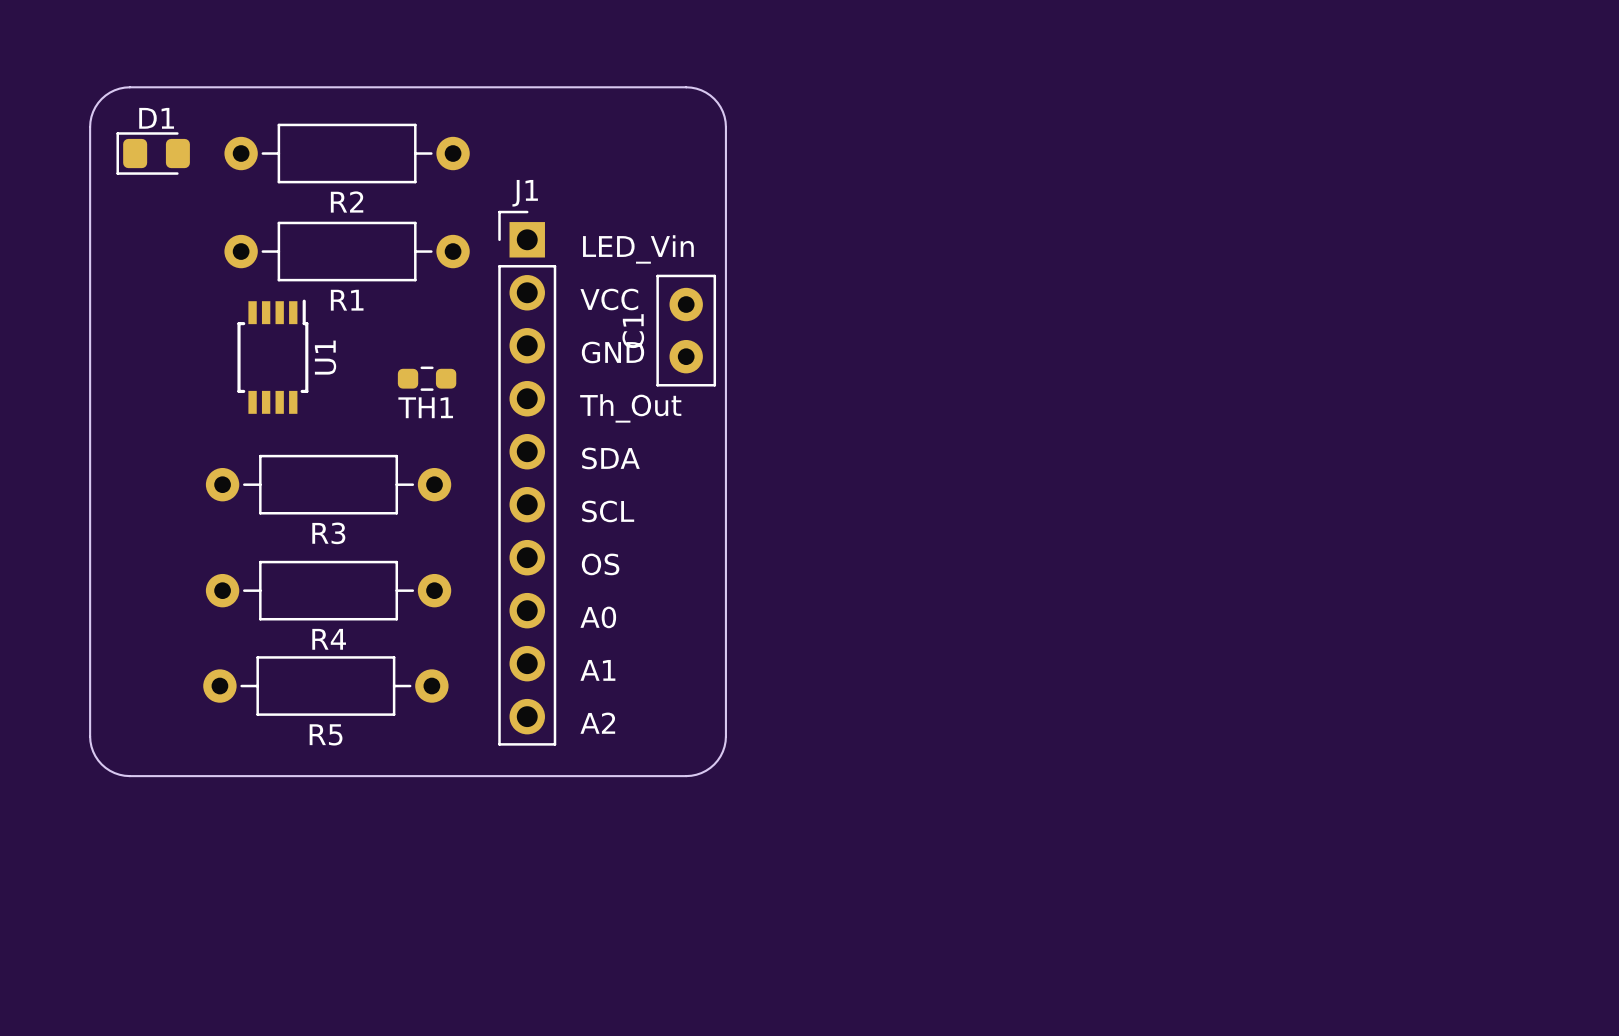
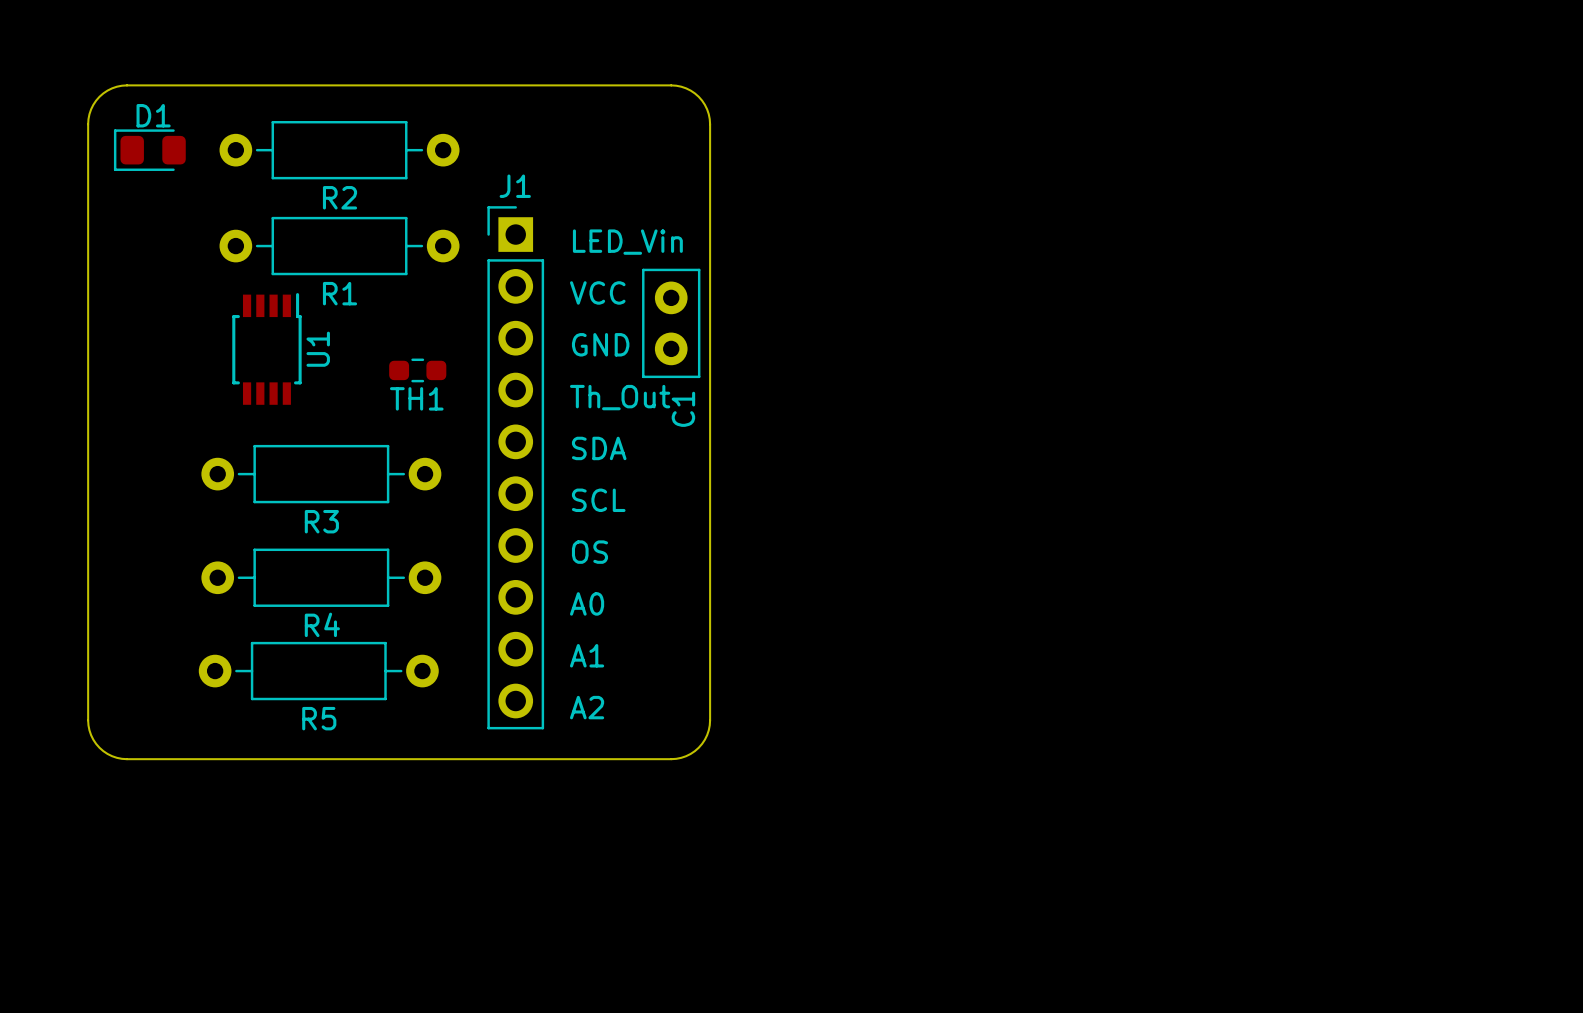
C1 name position: C1 (633, 331) -> C1 (683, 409)

